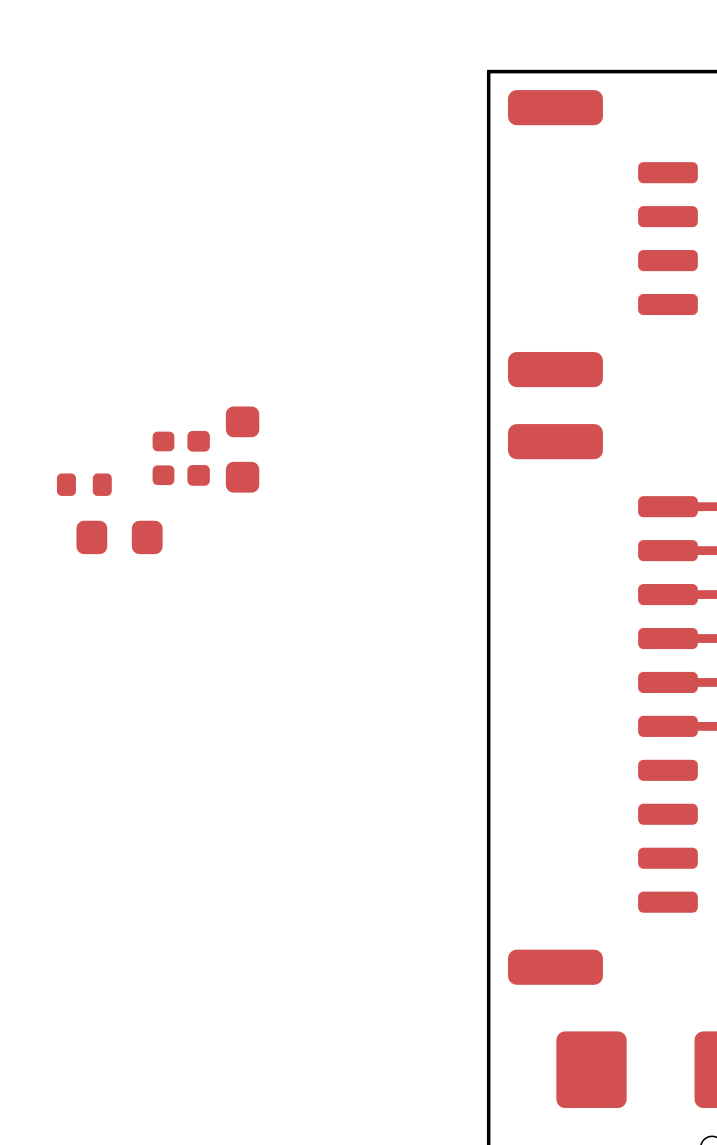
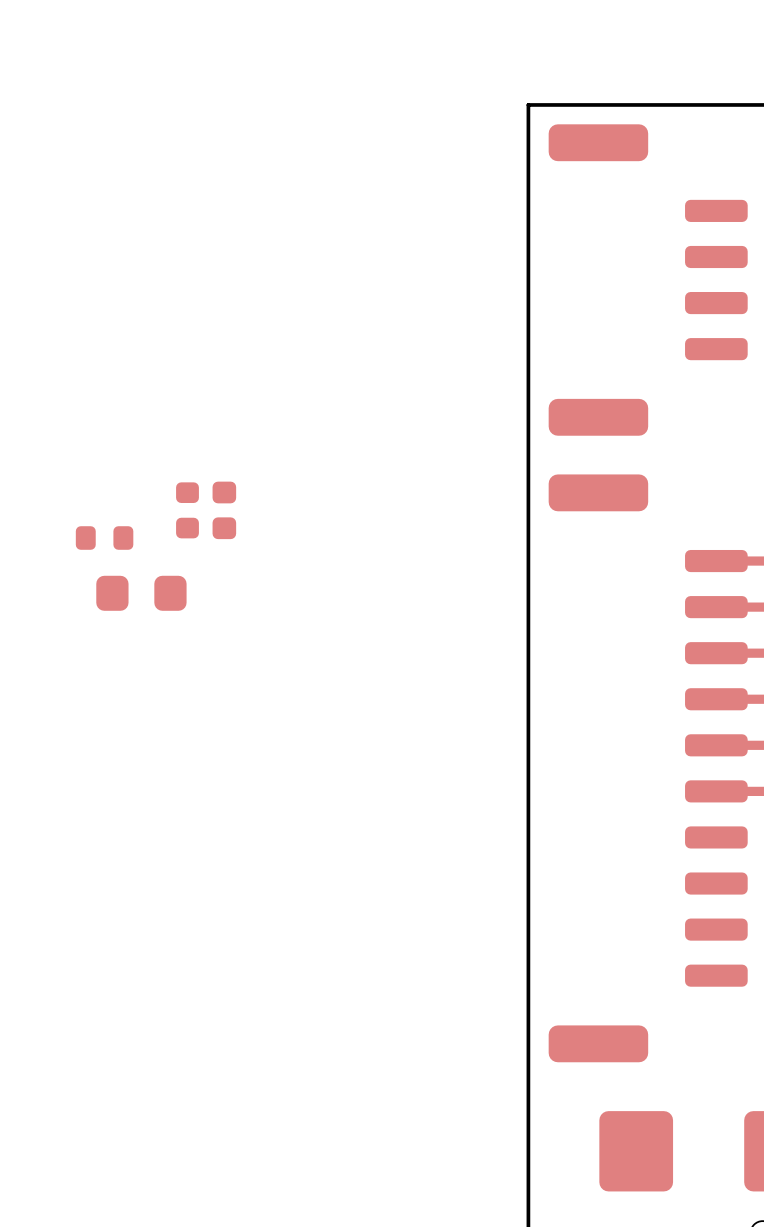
part: (242, 449) -> none

